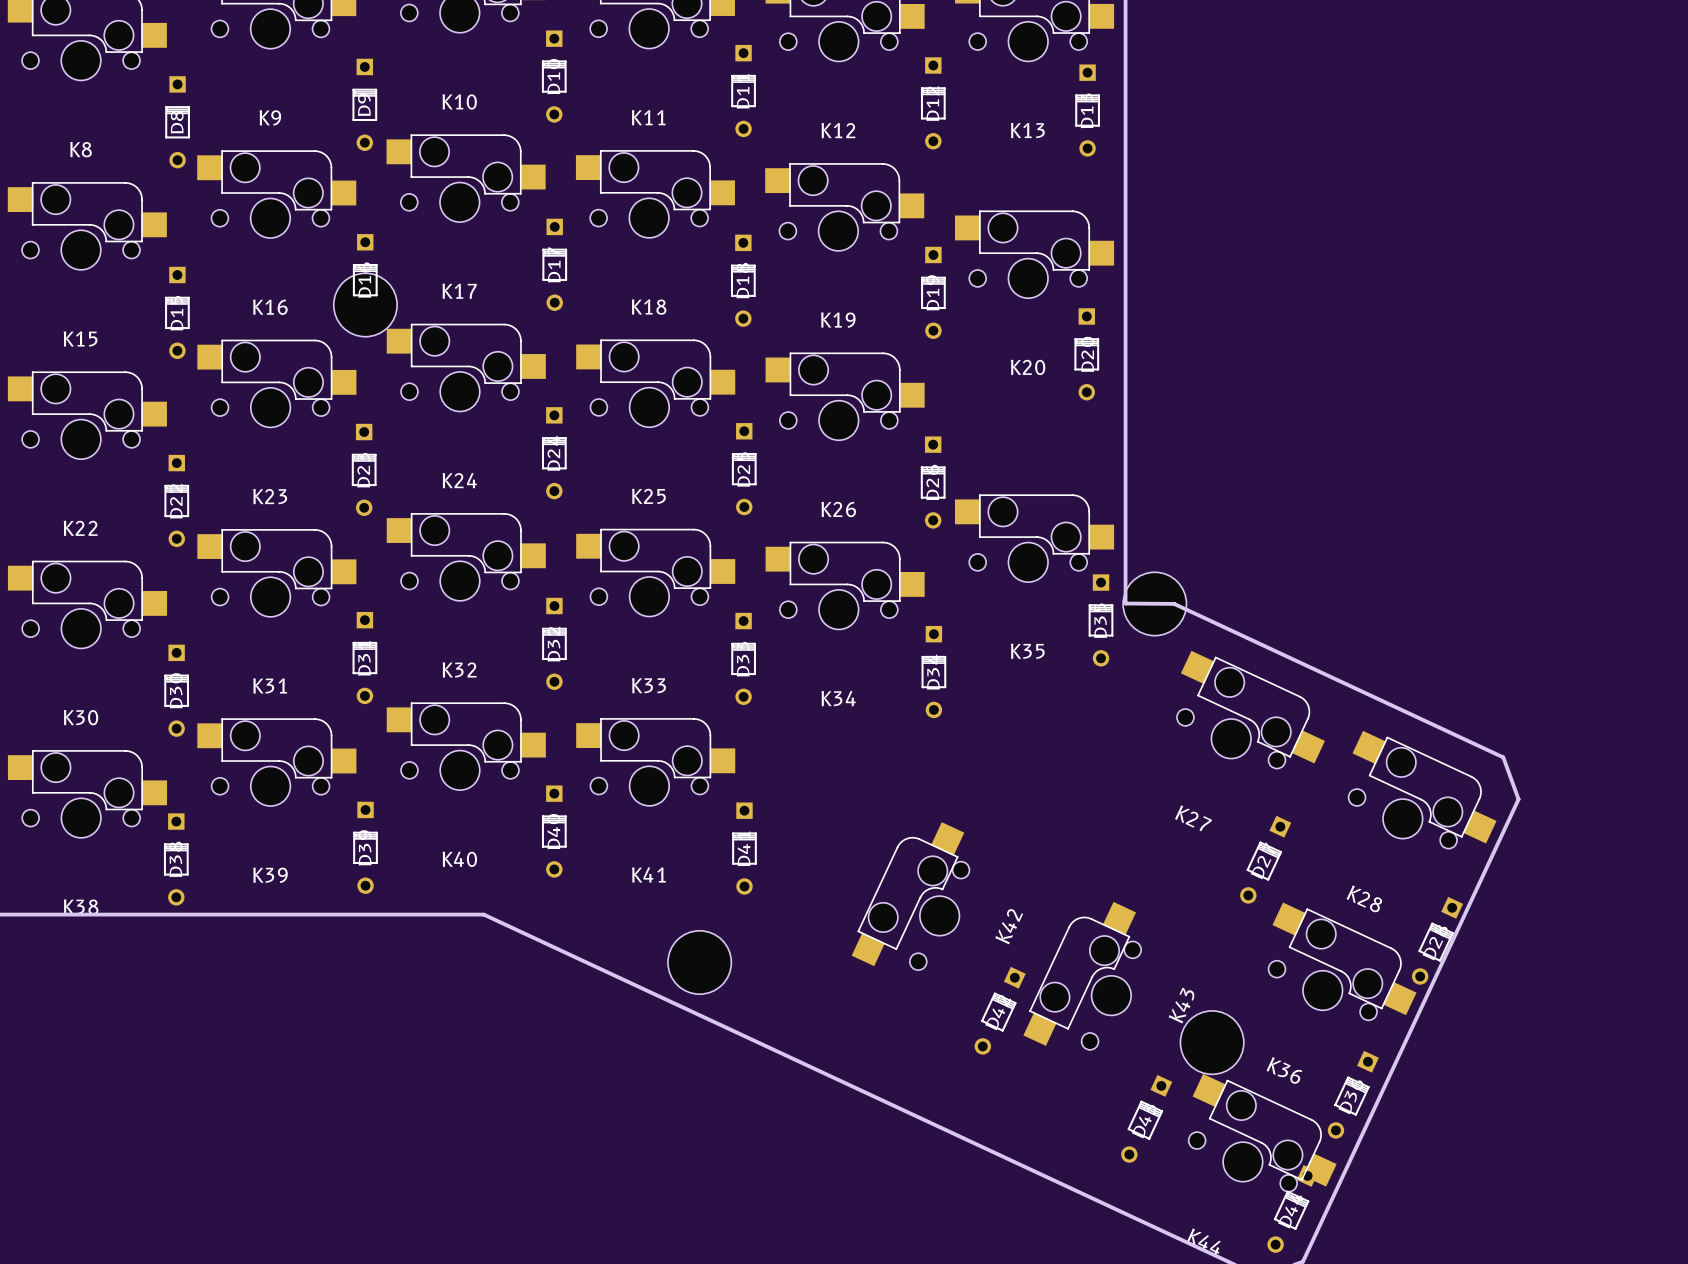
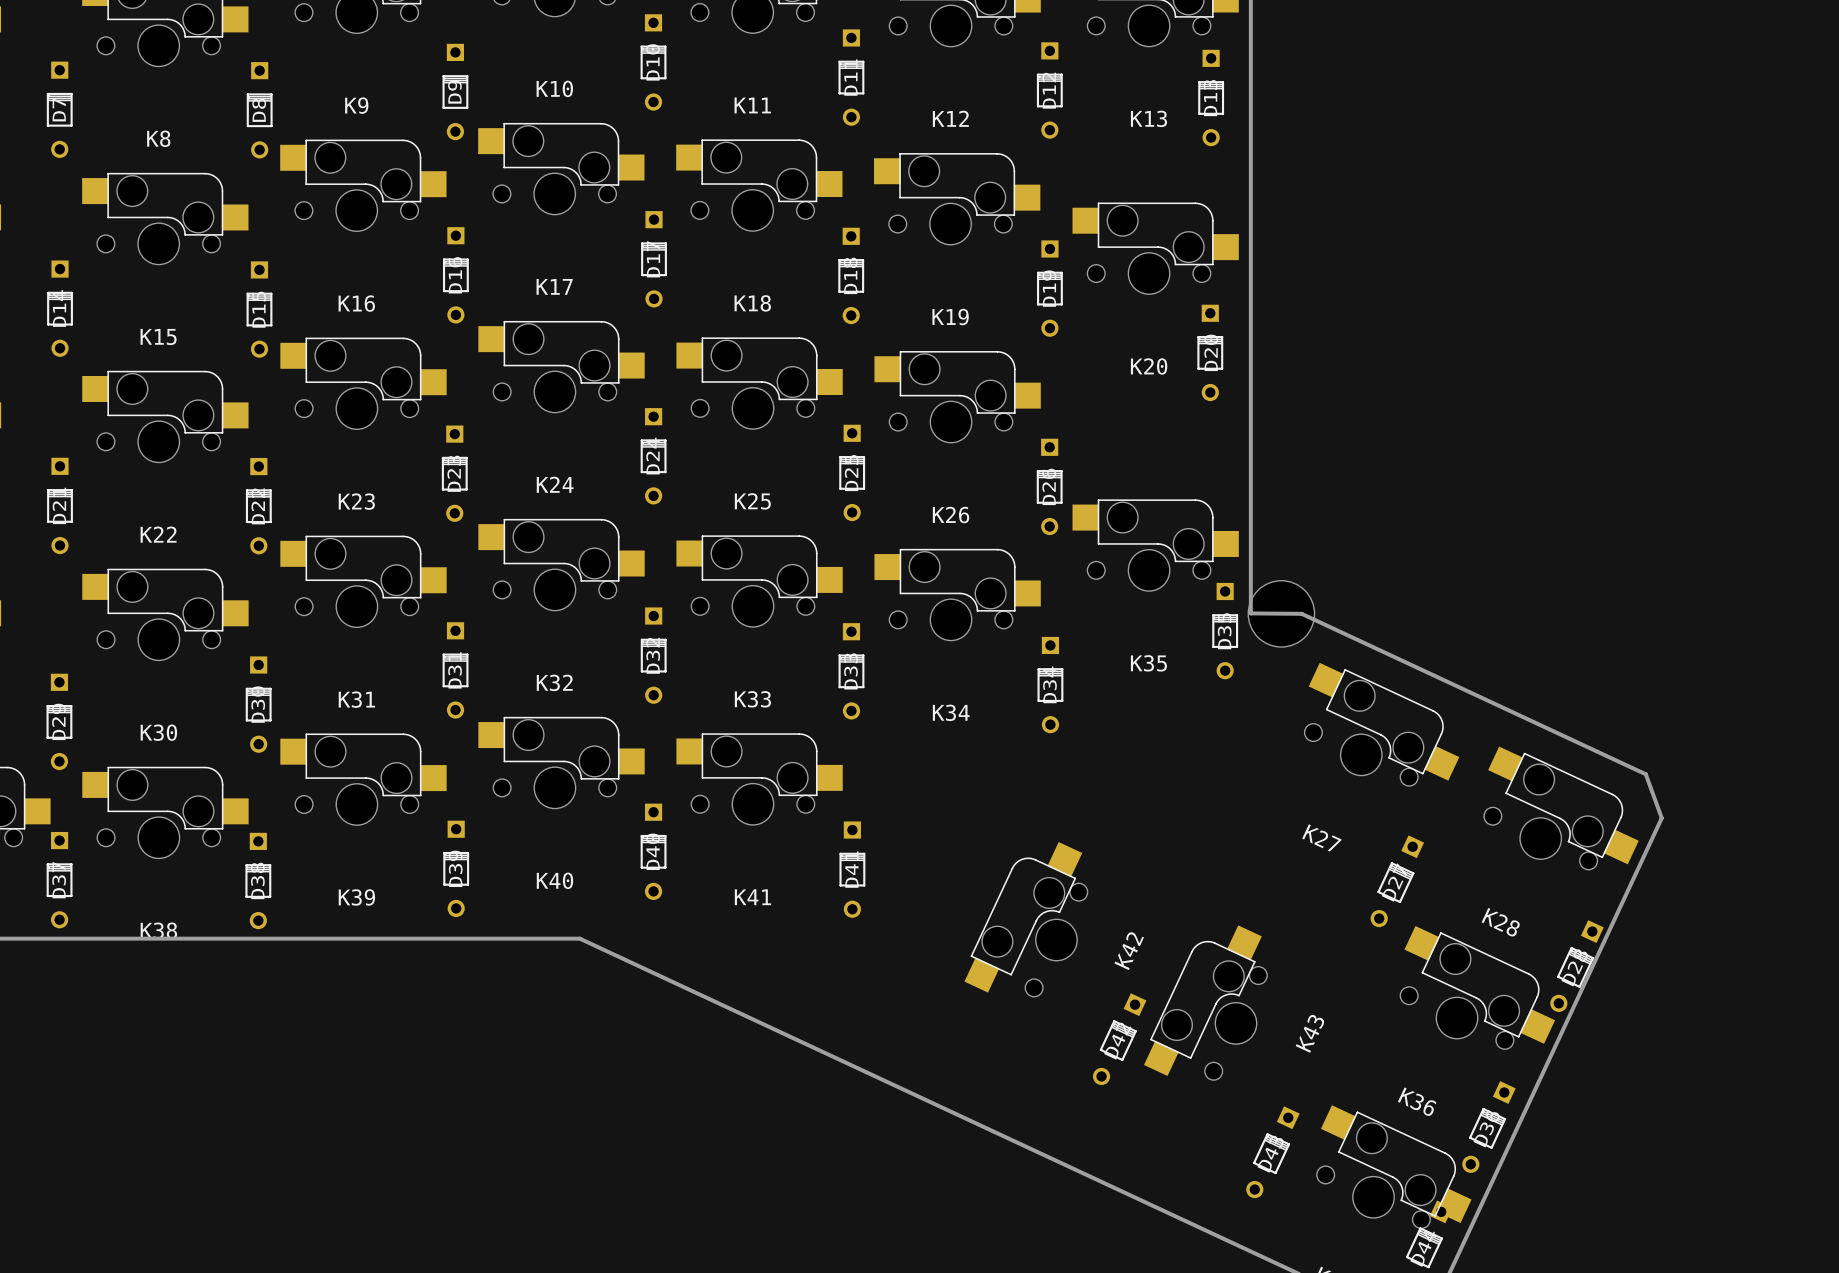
part: (365, 305) -> none
part: (699, 962) -> none
part: (1212, 1042) -> none

